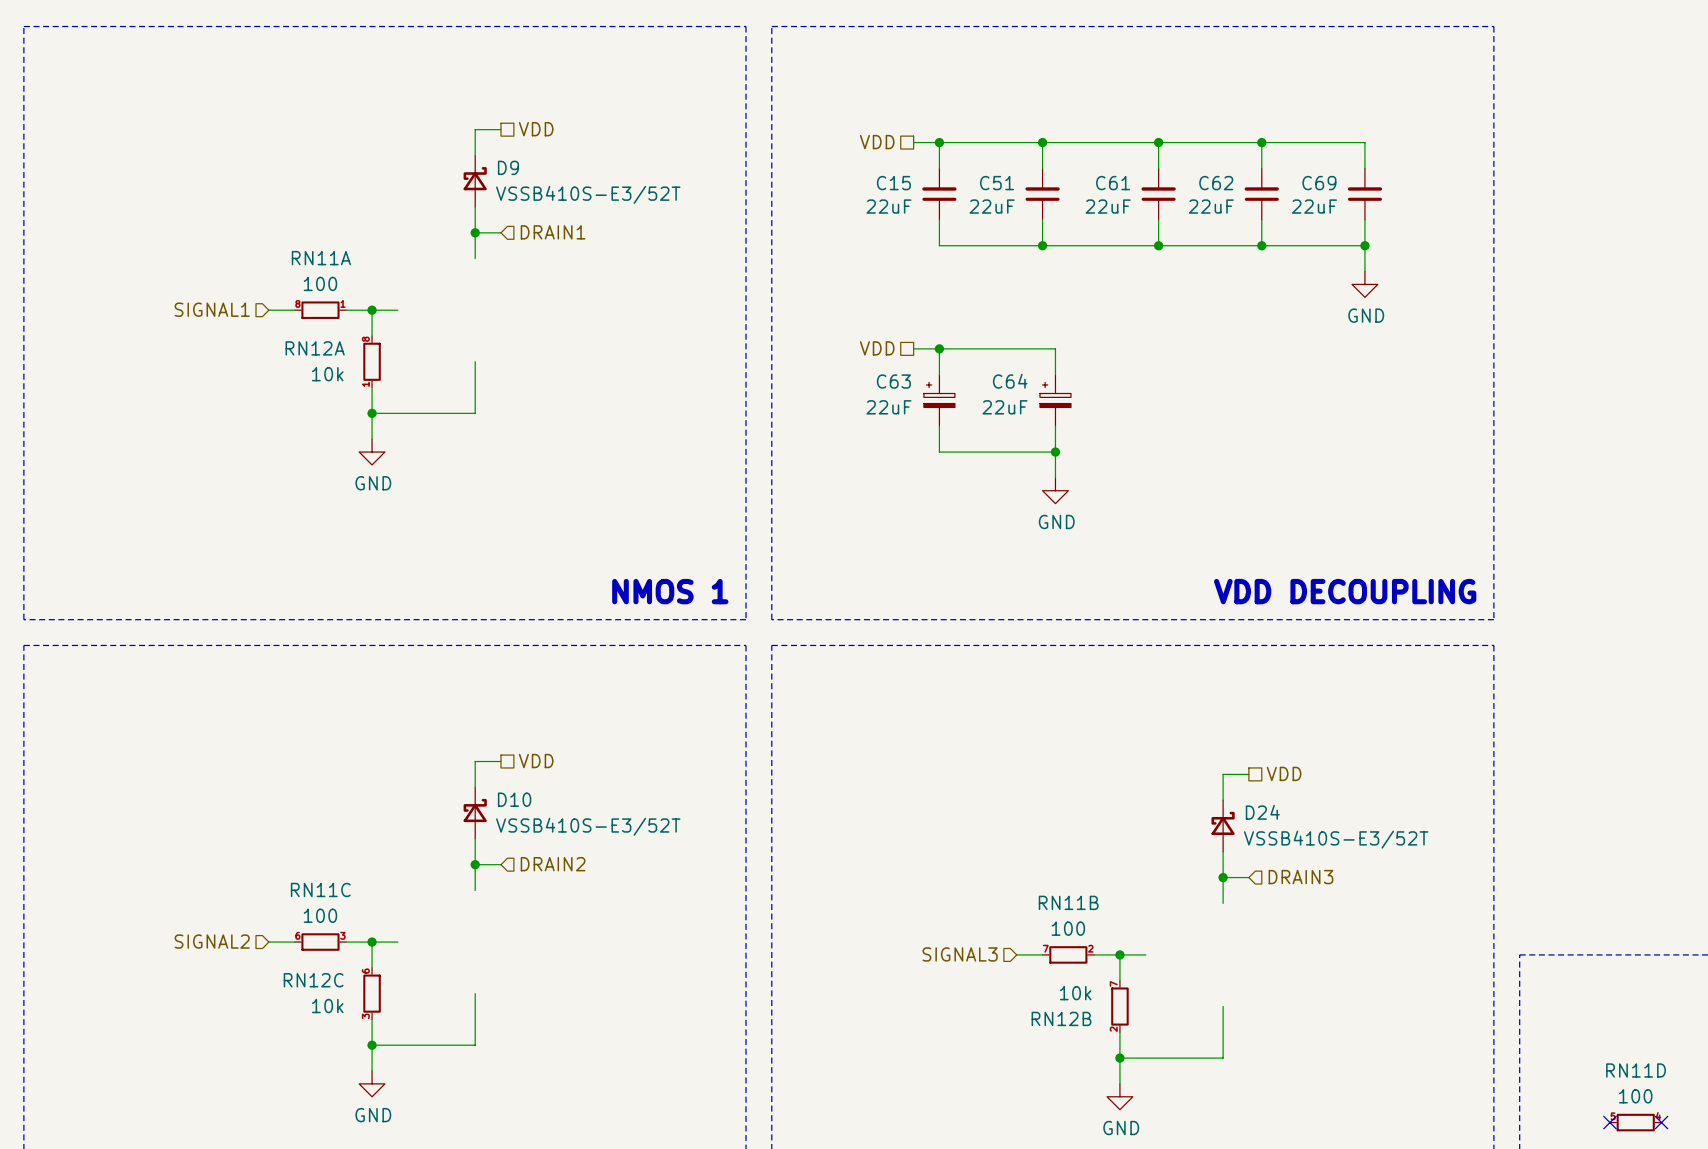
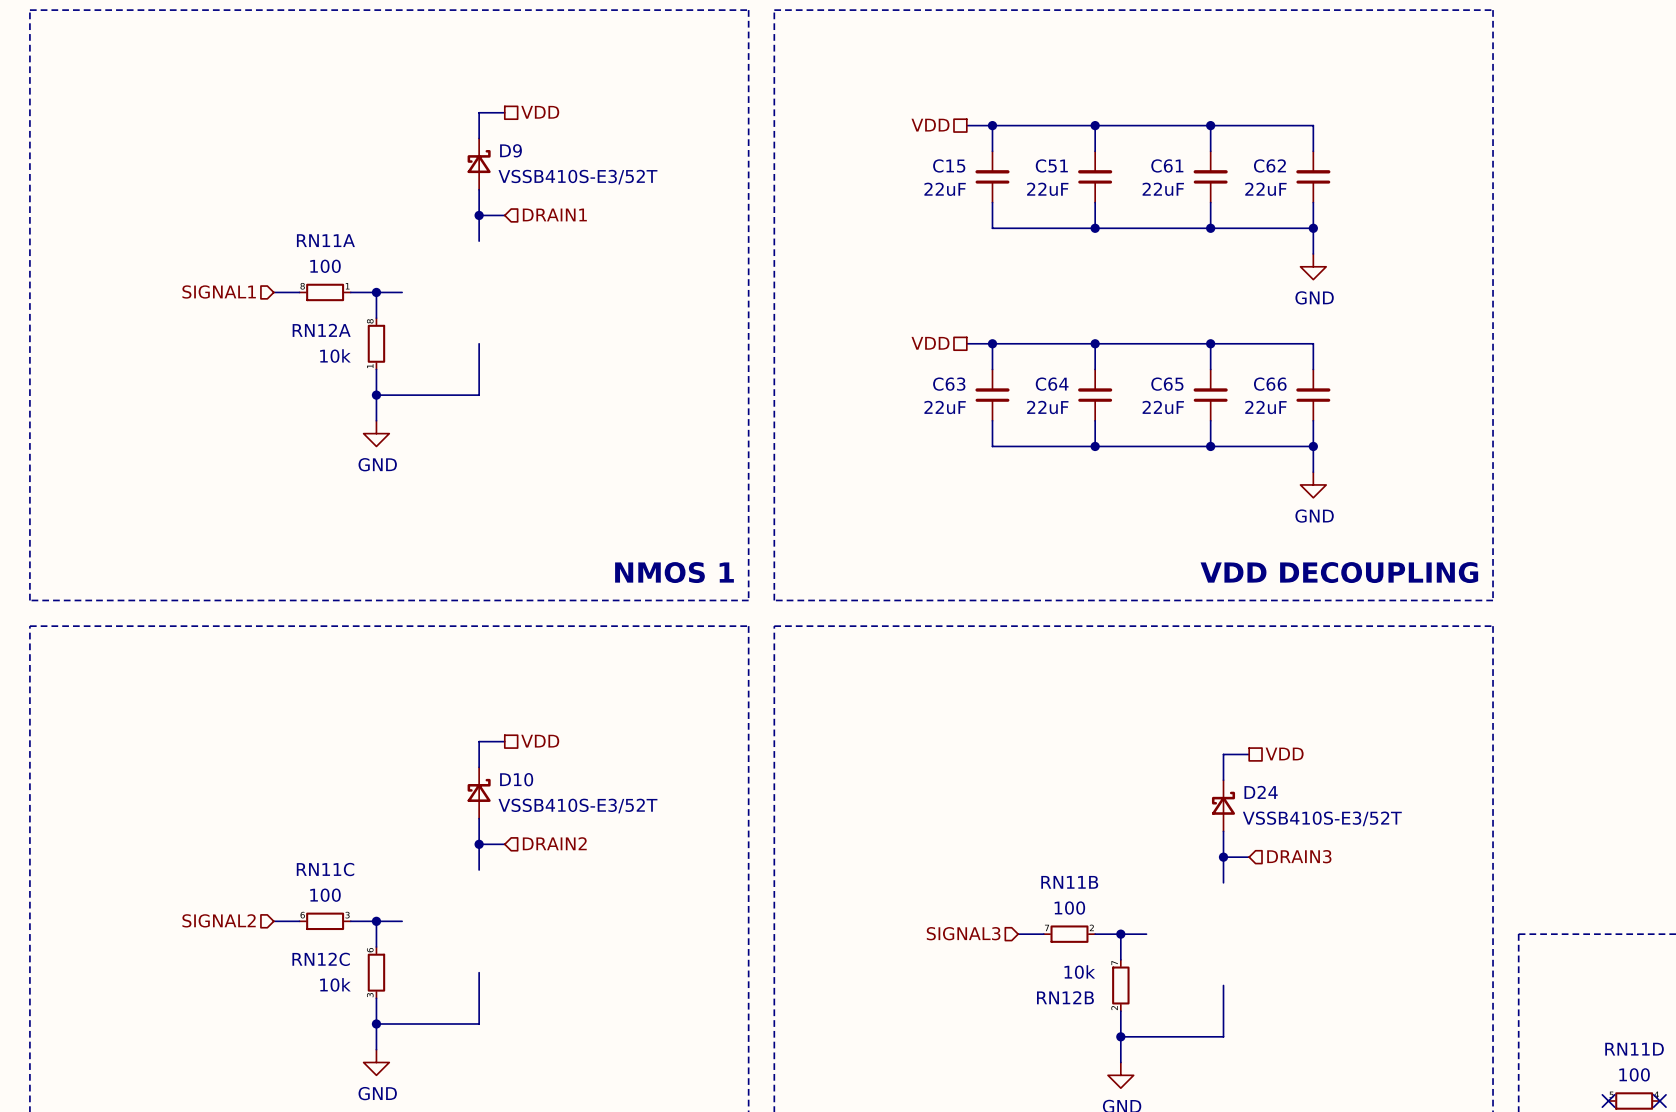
hierarchical label position: VDD (877, 142) -> VDD (930, 125)
wire: (913, 142) (965, 142) -> none
wire: (939, 142) (939, 168) -> (992, 125) (992, 151)
junction: (939, 142) -> none
junction: none -> (992, 125)
wire: (1042, 142) (1042, 168) -> (1095, 125) (1095, 151)
junction: (1042, 142) -> none
junction: none -> (1095, 125)
wire: (1158, 142) (1158, 168) -> (1210, 125) (1210, 151)
junction: (1158, 142) -> none
junction: none -> (1210, 125)
wire: (1261, 142) (1261, 168) -> (1210, 343) (1210, 369)
junction: (1261, 142) -> none
wire: (1313, 142) (1364, 142) (1364, 168) -> (1313, 125) (1313, 151)
C15 position: (939, 194) -> (992, 176)
C51 position: (1042, 194) -> (1095, 176)
C61 position: (1158, 194) -> (1210, 176)
C62 position: (1261, 194) -> (1313, 176)
C69: 22uF (1364, 194) -> none
wire: (939, 219) (939, 245) (990, 245) -> (992, 202) (992, 228)
wire: (1042, 219) (1042, 245) -> (1095, 202) (1095, 228)
wire: (1158, 219) (1158, 245) -> (1210, 202) (1210, 228)
wire: (1261, 219) (1261, 245) -> (1210, 420) (1210, 446)
wire: (1364, 219) (1364, 271) -> (1313, 202) (1313, 253)
junction: (1042, 245) -> none
junction: none -> (1095, 228)
junction: (1158, 245) -> none
junction: none -> (1210, 228)
junction: (1261, 245) -> none
wire: (1313, 245) (1364, 245) -> none
junction: none -> (1313, 228)
junction: (1364, 245) -> none
power symbol position: GND (1364, 284) -> GND (1313, 266)
hierarchical label position: VDD (877, 348) -> VDD (930, 343)
wire: (913, 348) (1055, 348) (1055, 374) -> none
wire: (939, 348) (939, 374) -> (992, 343) (992, 369)
junction position: (939, 348) -> (992, 343)
wire: none -> (966, 343) (1313, 343) (1313, 369)
wire: none -> (1095, 343) (1095, 369)
junction: none -> (1095, 343)
junction: none -> (1210, 343)
C63 symbol: [923, 374, 955, 427] -> [975, 369, 1010, 421]
C64 symbol: [1039, 374, 1071, 427] -> [1078, 369, 1113, 421]
C65: none -> 22uF (1210, 395)
C66: none -> 22uF (1313, 395)
wire: (939, 426) (939, 452) (1055, 452) -> none
wire: (1055, 426) (1055, 477) -> none
wire: none -> (992, 420) (992, 446) (1313, 446)
wire: none -> (1095, 420) (1095, 446)
wire: none -> (1313, 420) (1313, 472)
junction position: (1055, 452) -> (1095, 446)
junction: none -> (1210, 446)
junction: none -> (1313, 446)
power symbol: GND (1055, 490) -> none
power symbol: none -> GND (1313, 484)

